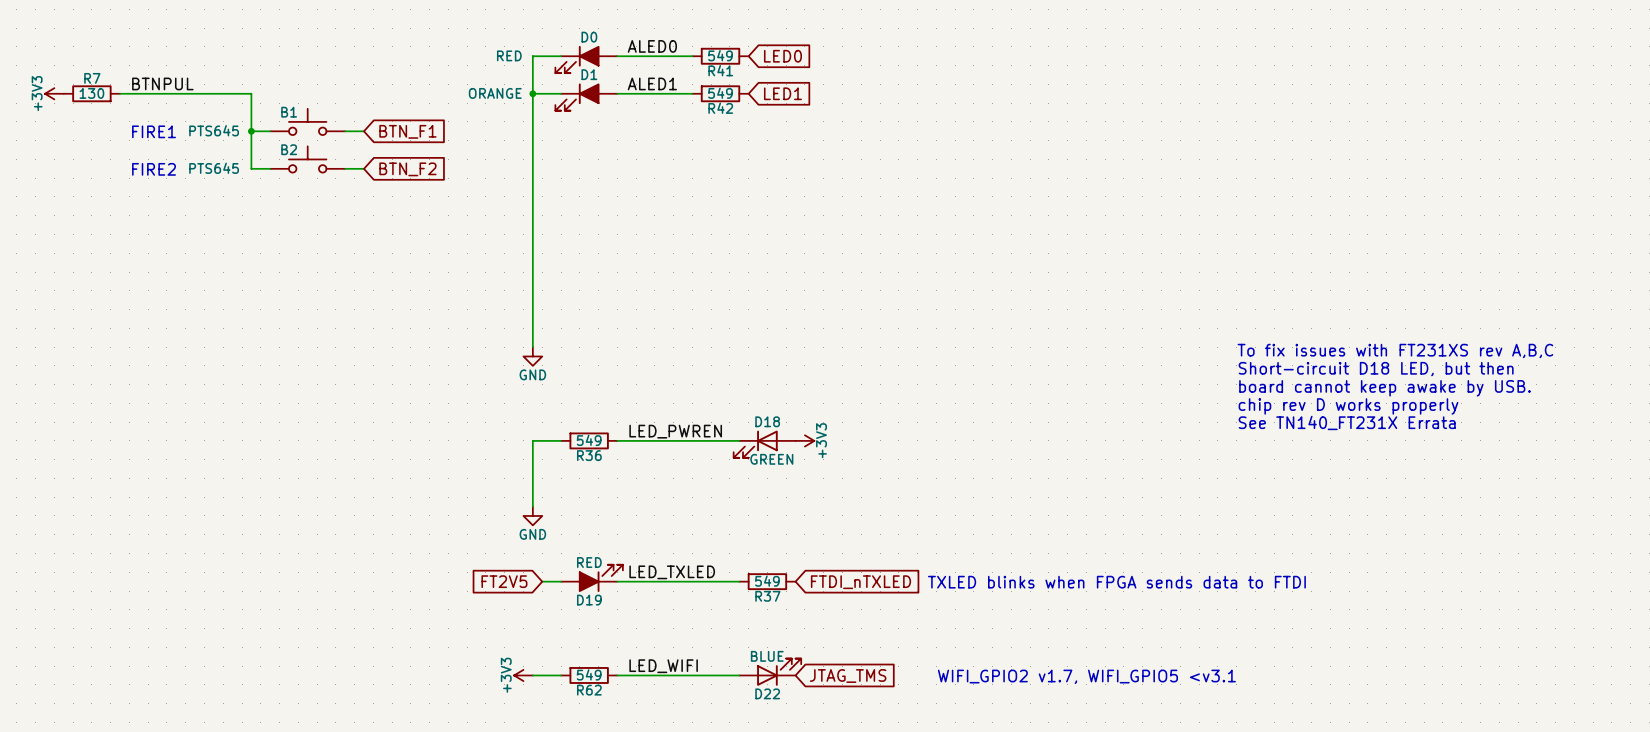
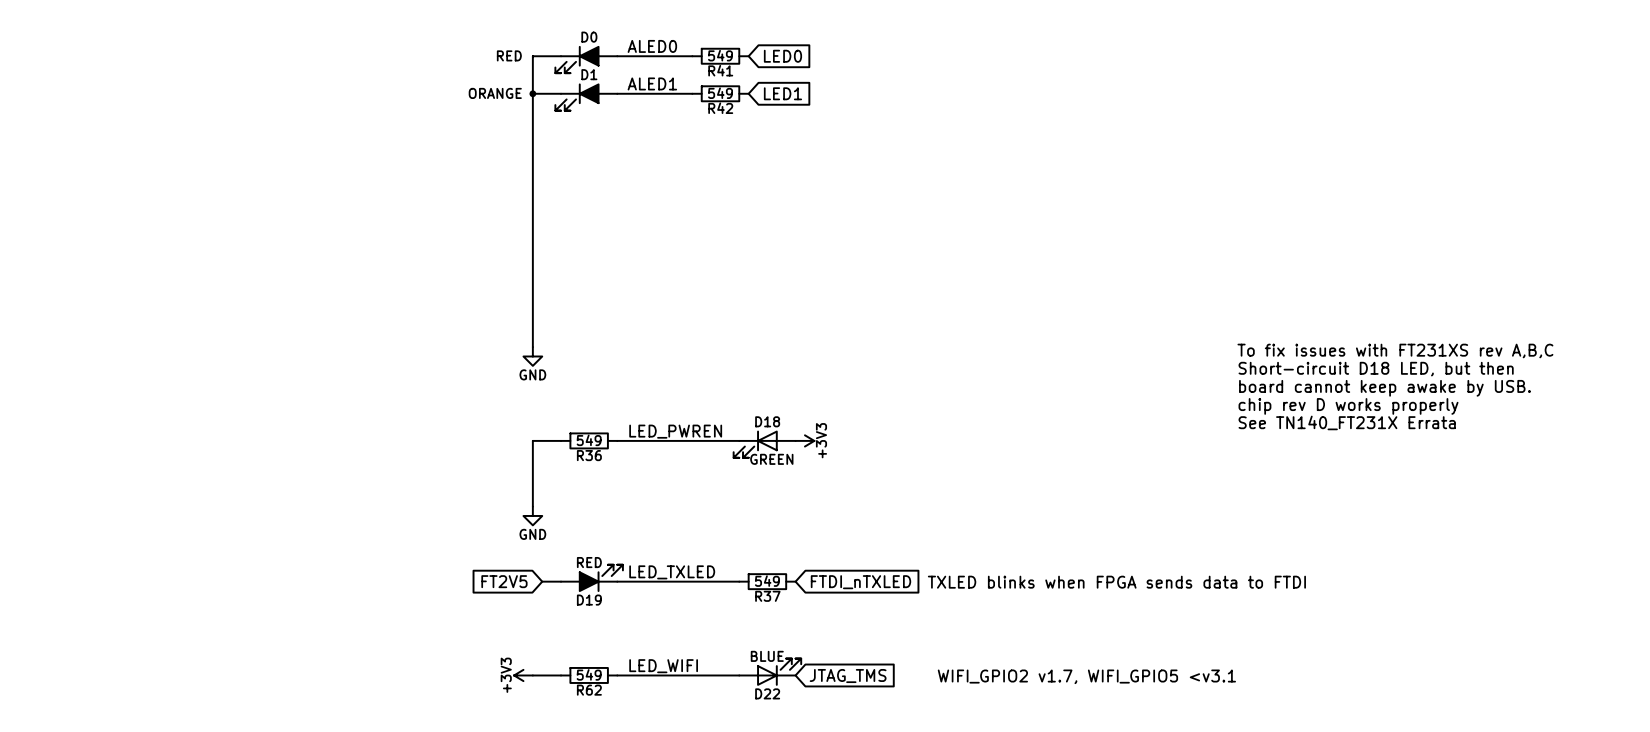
label: BTNPUL (162, 83) -> none
power symbol: +3V3 (54, 93) -> none
R7: 130 (91, 93) -> none
wire: (120, 93) (251, 93) (251, 168) (270, 168) -> none
B1: PTS645 (307, 121) -> none
text: FIRE1 (154, 131) -> none
wire: (251, 131) (270, 131) -> none
junction: (251, 131) -> none
wire: (345, 131) (363, 131) -> none
global label: BTN_F1 (407, 131) -> none
B2: PTS645 (307, 159) -> none
wire: (345, 168) (363, 168) -> none
text: FIRE2 (154, 169) -> none
global label: BTN_F2 (407, 169) -> none

